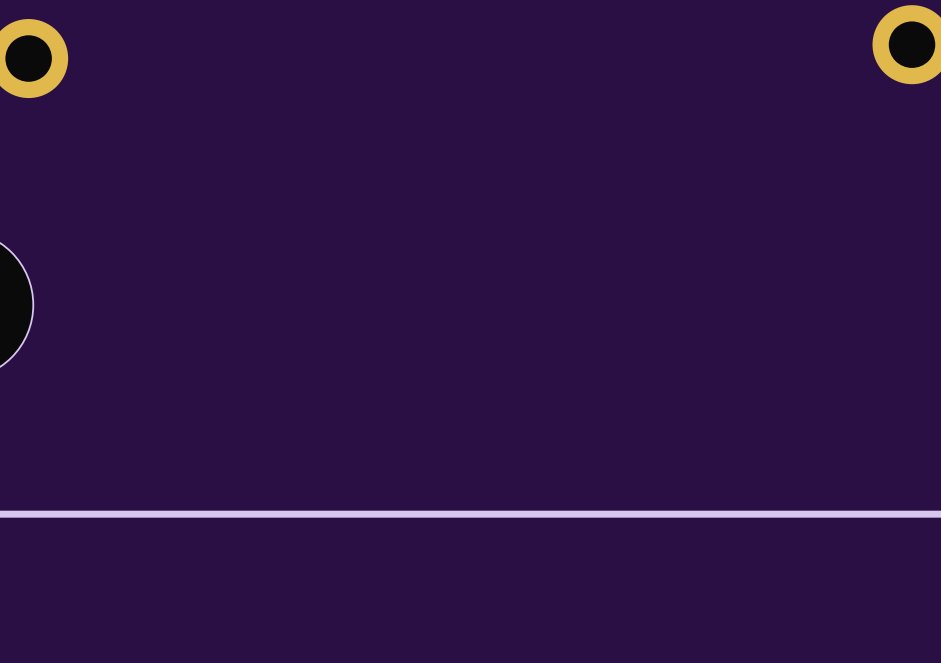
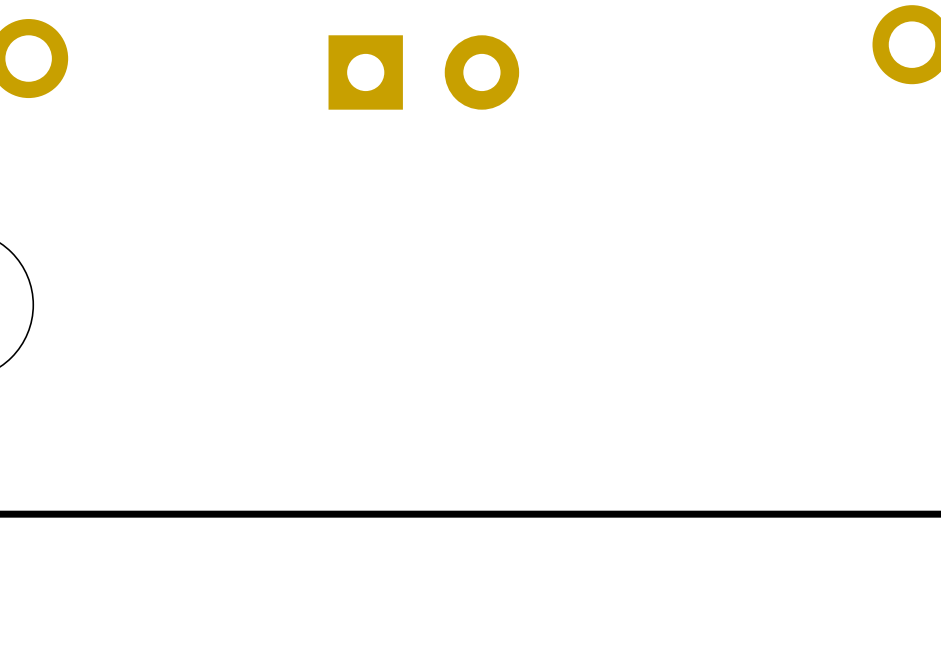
part: none -> (423, 72)

